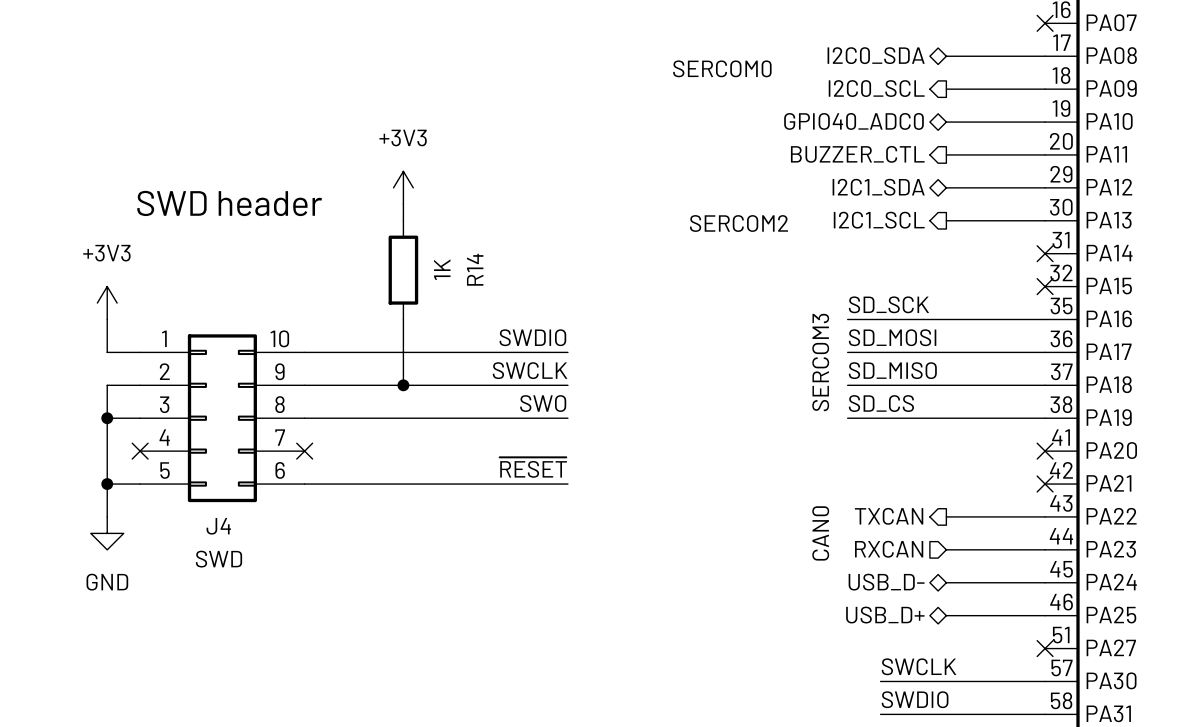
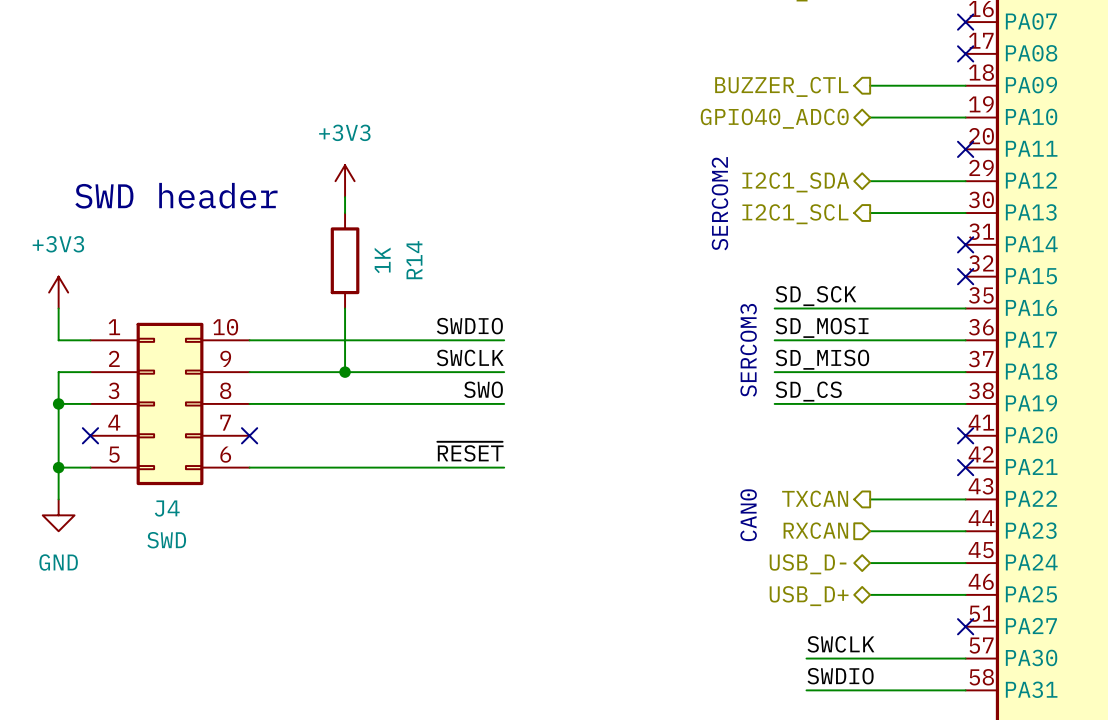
hierarchical label: I2C0_SDA (876, 55) -> none
wire: (946, 56) (1045, 56) -> none
no-connect mark: none -> (965, 53)
text: SERCOM0 (722, 68) -> none
hierarchical label: I2C0_SCL (876, 88) -> BUZZER_CTL (781, 86)
hierarchical label: BUZZER_CTL (857, 154) -> none
wire: (946, 154) (1045, 154) -> none
no-connect mark: none -> (965, 149)
text rotation: 0° (738, 223) -> 90° counterclockwise (719, 203)

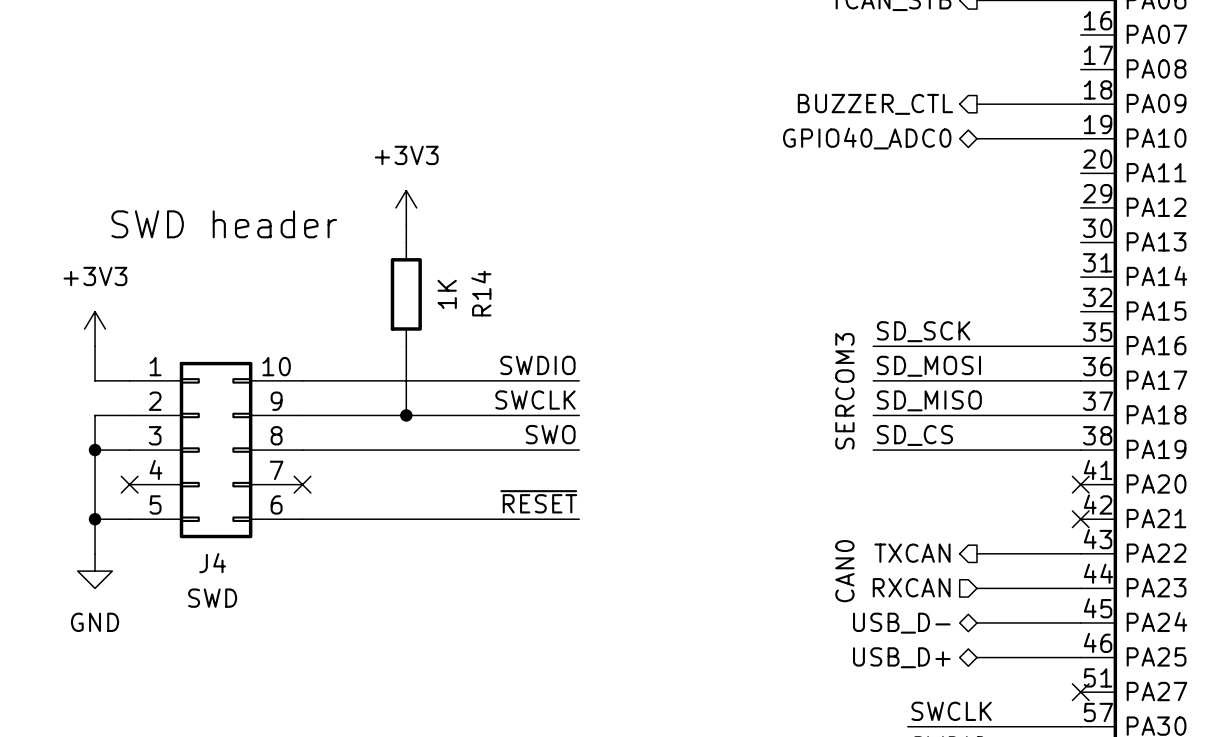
no-connect mark: (965, 22) -> none
no-connect mark: (965, 53) -> none
no-connect mark: (965, 149) -> none
wire: (870, 181) (965, 181) -> none
hierarchical label: I2C1_SDA (795, 182) -> none
text: SERCOM2 (719, 203) -> none
wire: (870, 213) (965, 213) -> none
hierarchical label: I2C1_SCL (795, 214) -> none
no-connect mark: (965, 244) -> none
no-connect mark: (965, 276) -> none

